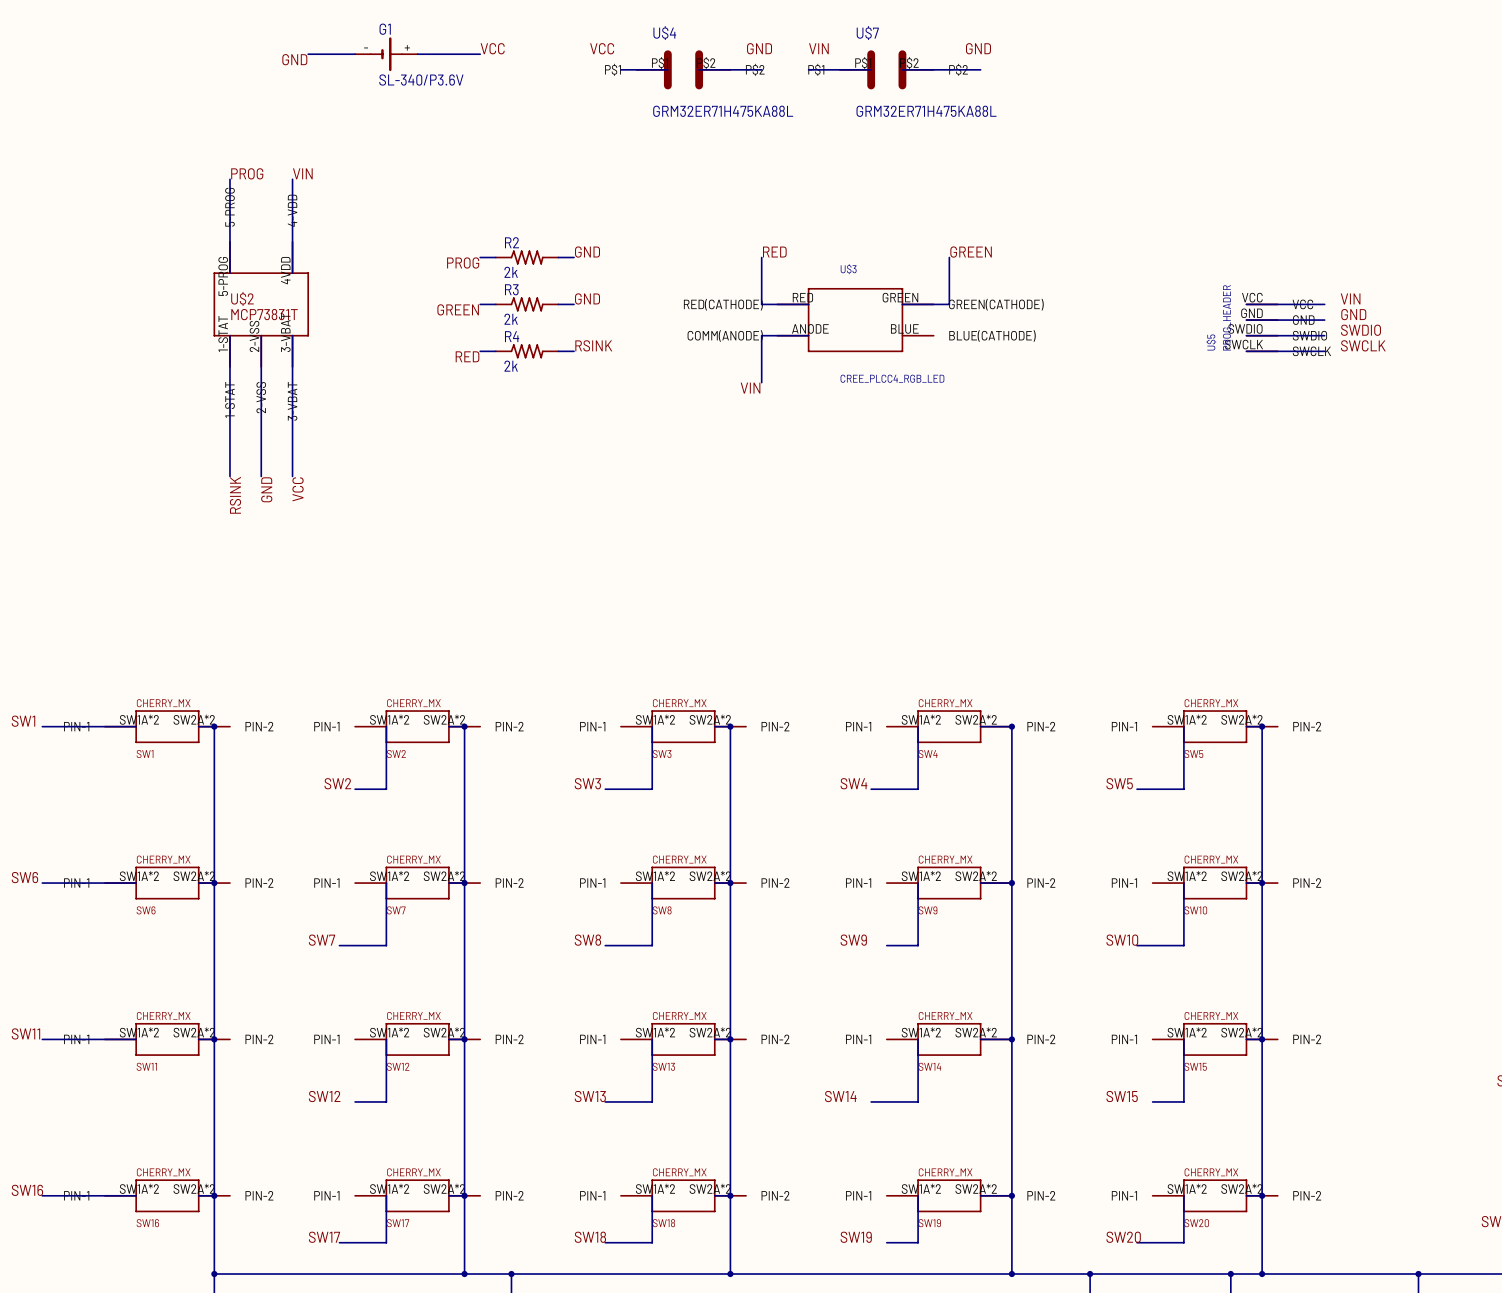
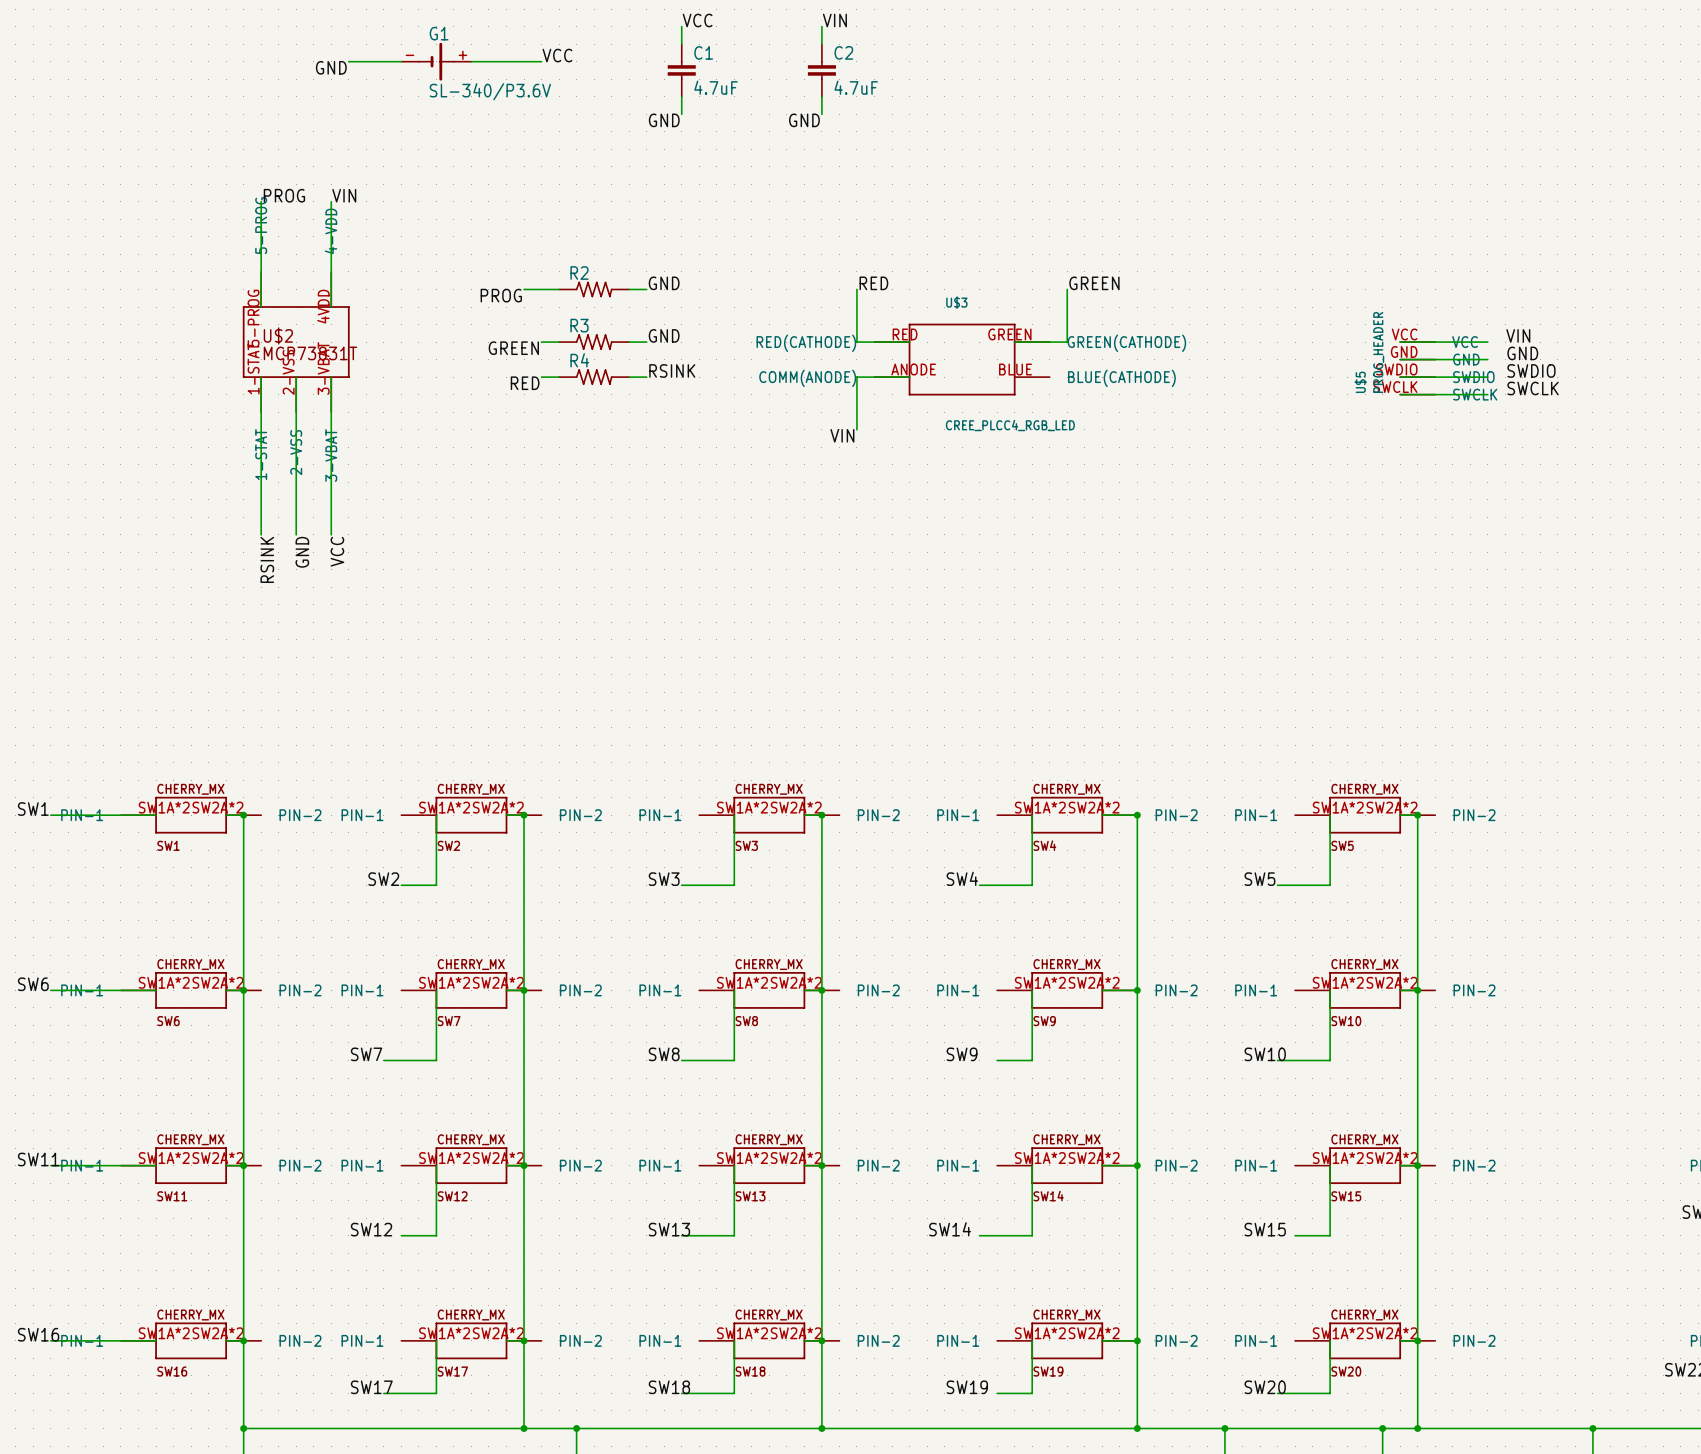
wire: none -> (681, 26) (681, 44)
wire: none -> (821, 26) (821, 44)
label position: VCC (602, 48) -> VCC (697, 20)
label position: GND (759, 48) -> GND (804, 120)
label position: VIN (818, 48) -> VIN (834, 20)
label: GND (978, 48) -> none
C1: none -> 4.7uF (681, 70)
C2: none -> 4.7uF (821, 70)
wire: (620, 69) (667, 69) -> none
U$4: GRM32ER71H475KA88L (683, 69) -> none
wire: (699, 69) (761, 69) -> none
wire: (808, 69) (871, 69) -> none
U$7: GRM32ER71H475KA88L (886, 69) -> none
wire: (902, 69) (980, 69) -> none
wire: none -> (681, 96) (681, 114)
wire: none -> (821, 96) (821, 114)
label: none -> GND (664, 120)
wire: none -> (524, 289) (541, 289)
label position: PROG (463, 262) -> PROG (501, 295)
R2 value: 2k (511, 272) -> none
R3 value: 2k (511, 319) -> none
label position: RSINK (593, 345) -> RSINK (672, 370)
wire: (480, 351) (495, 351) -> (541, 377) (559, 377)
R4 position: (527, 351) -> (594, 377)
wire: (558, 351) (574, 351) -> (629, 377) (646, 377)
label position: RED (467, 356) -> RED (525, 383)
R4 value: 2k (511, 366) -> none

